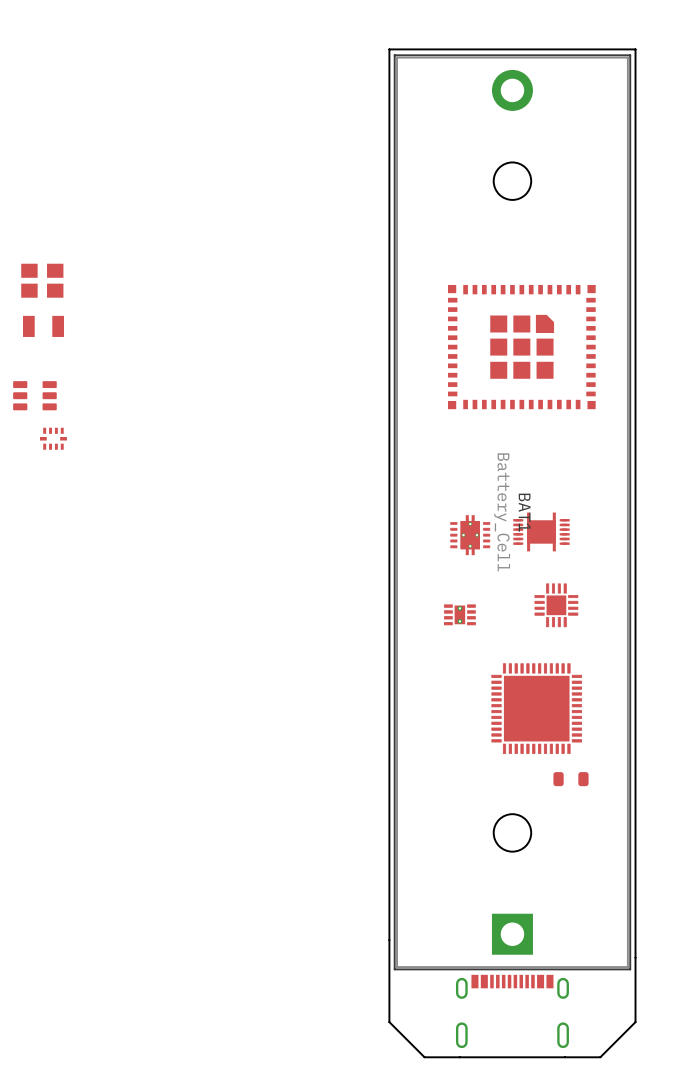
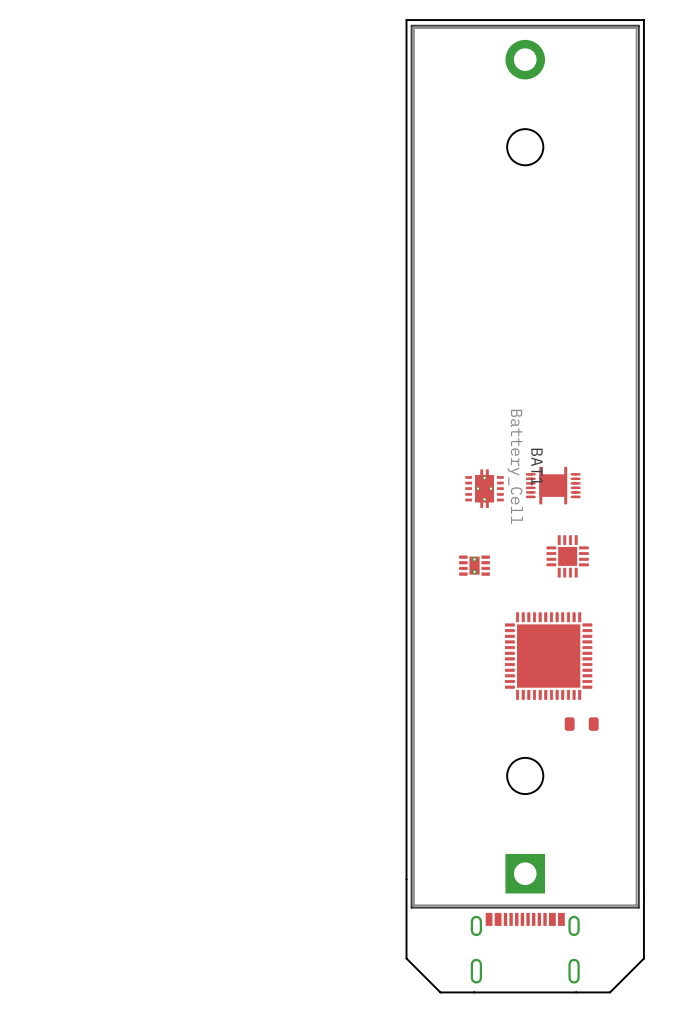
part: (42, 280) -> none
part: (43, 326) -> none
part: (521, 347) -> none
part: (34, 395) -> none
part: (53, 438) -> none

